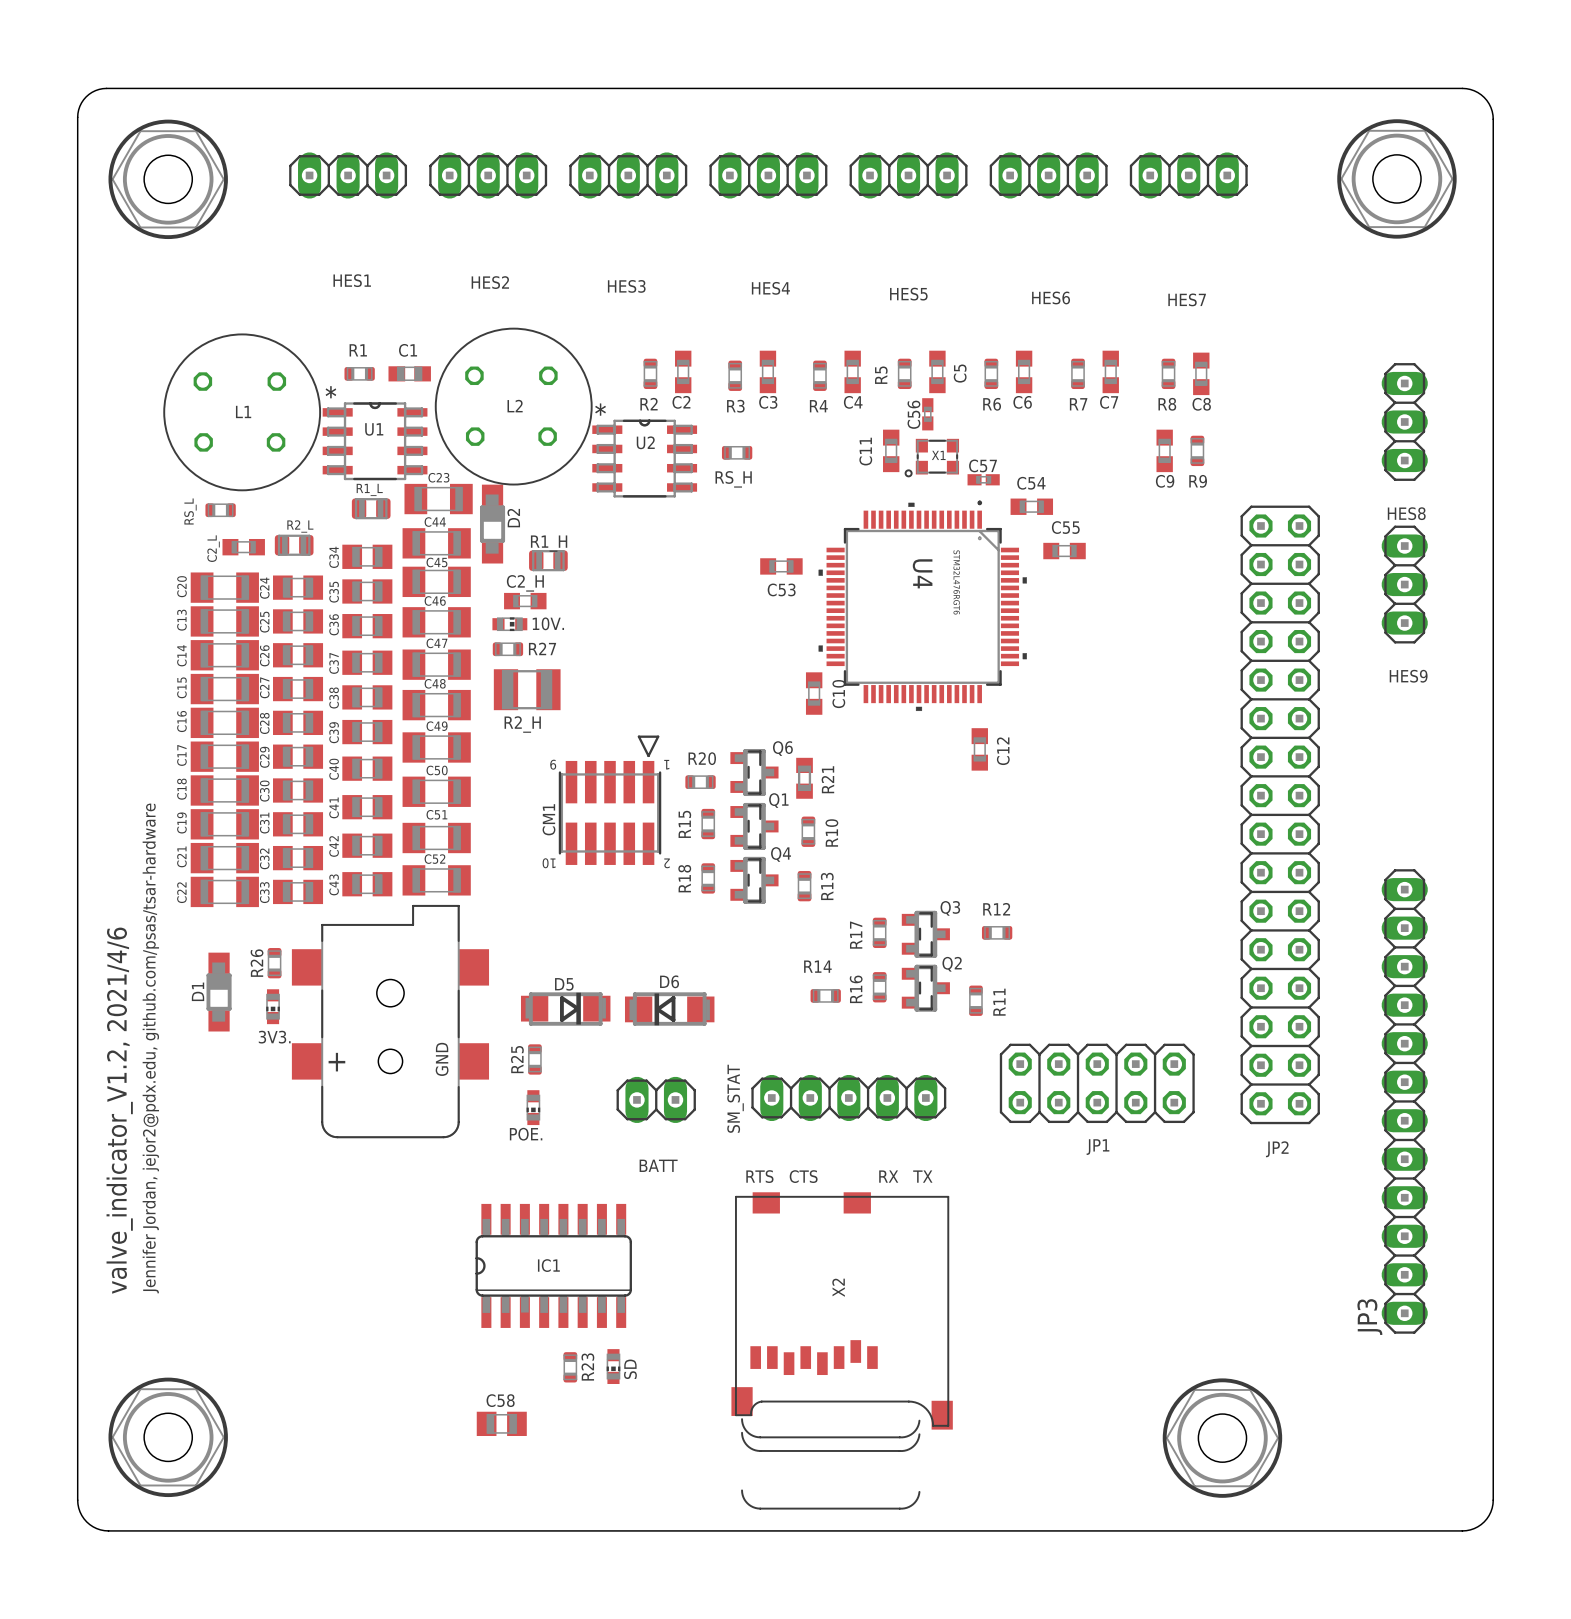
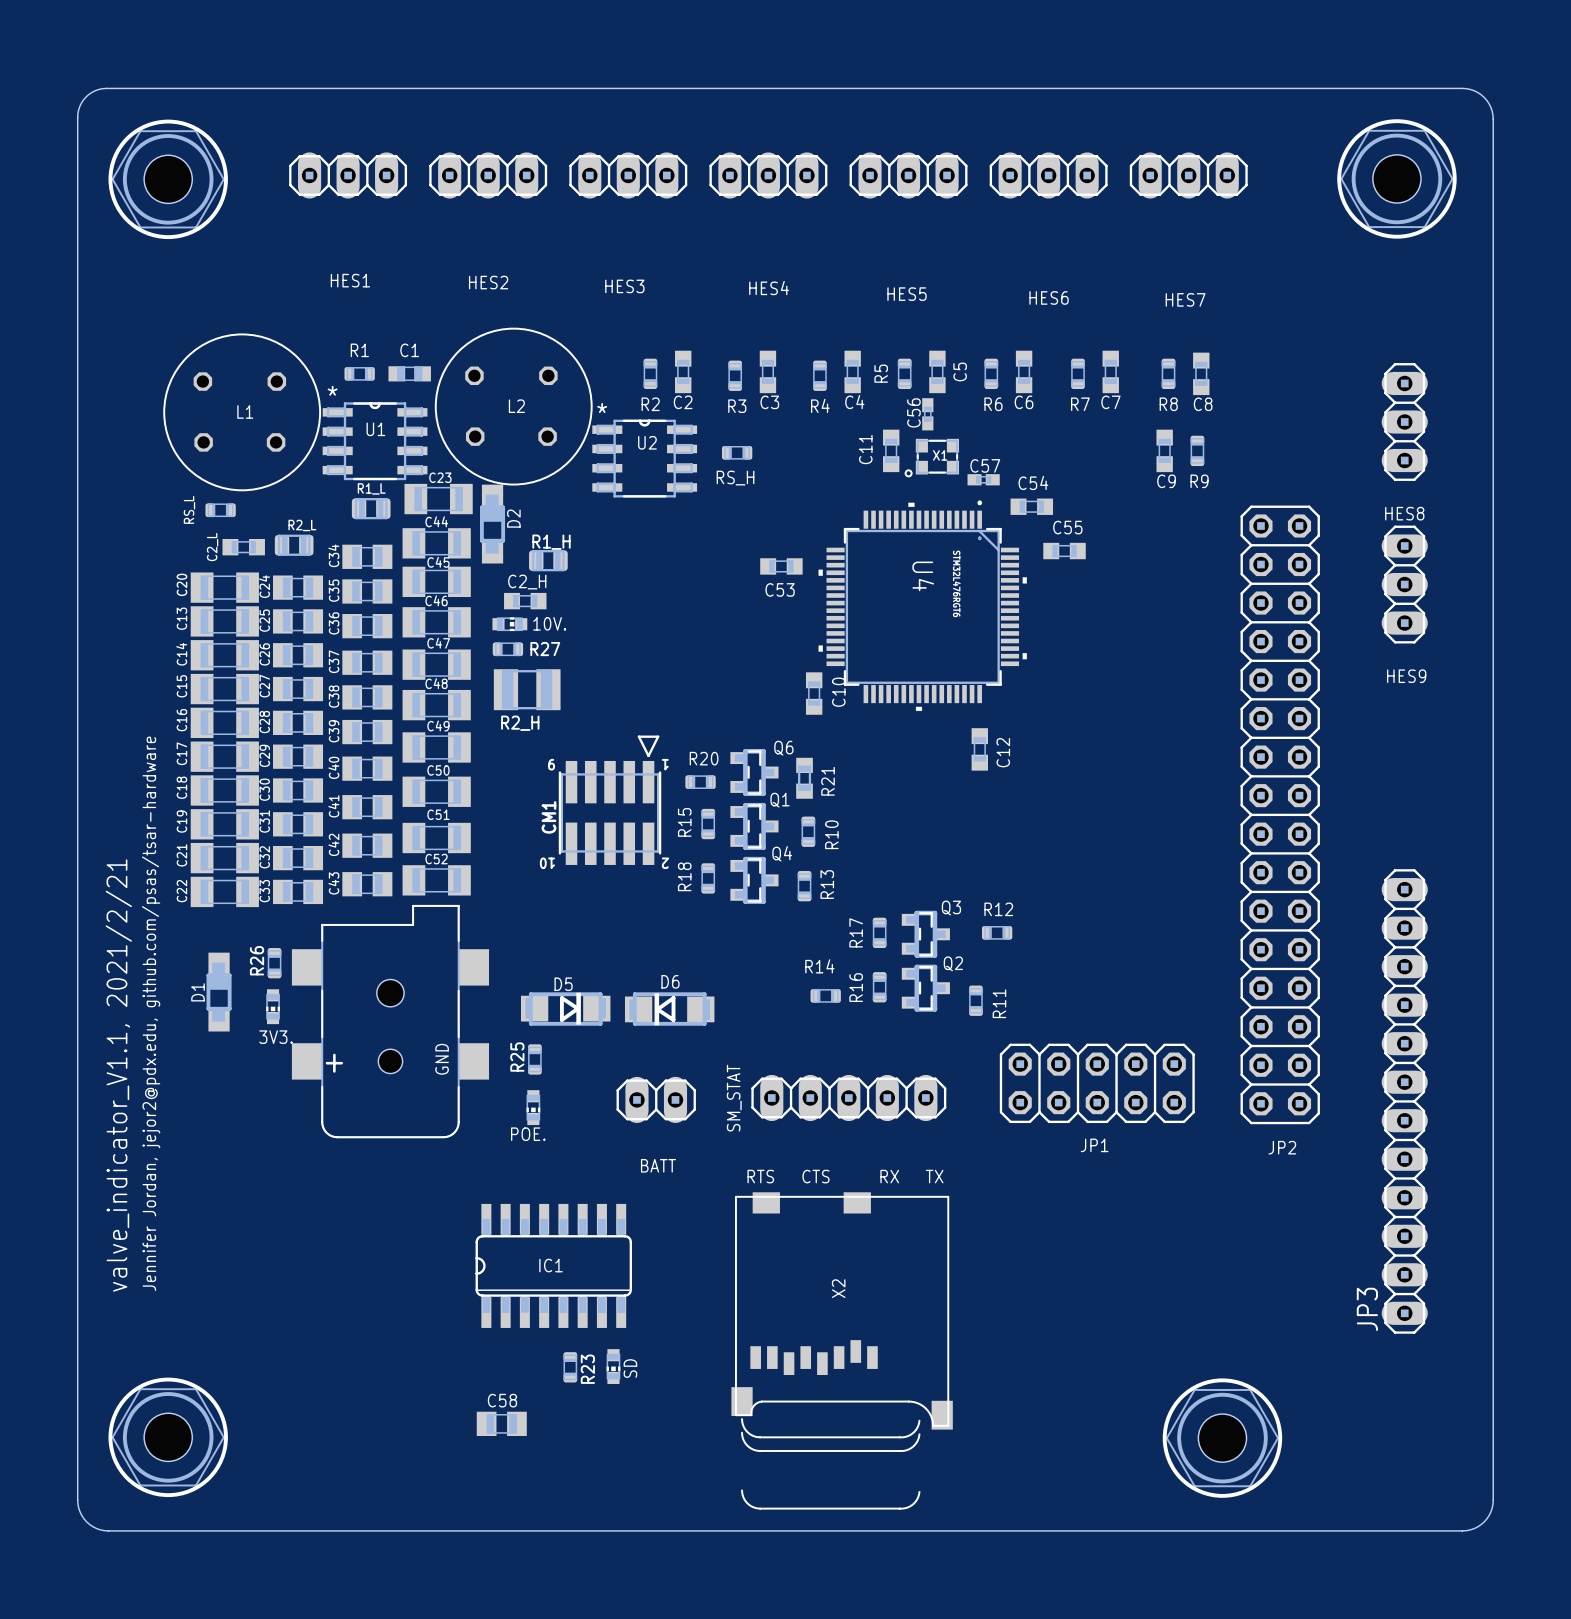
text: valve_indicator_V1.2, 2021/4/6 (119, 1110) -> valve_indicator_V1.1, 2021/2/21 (118, 1075)

